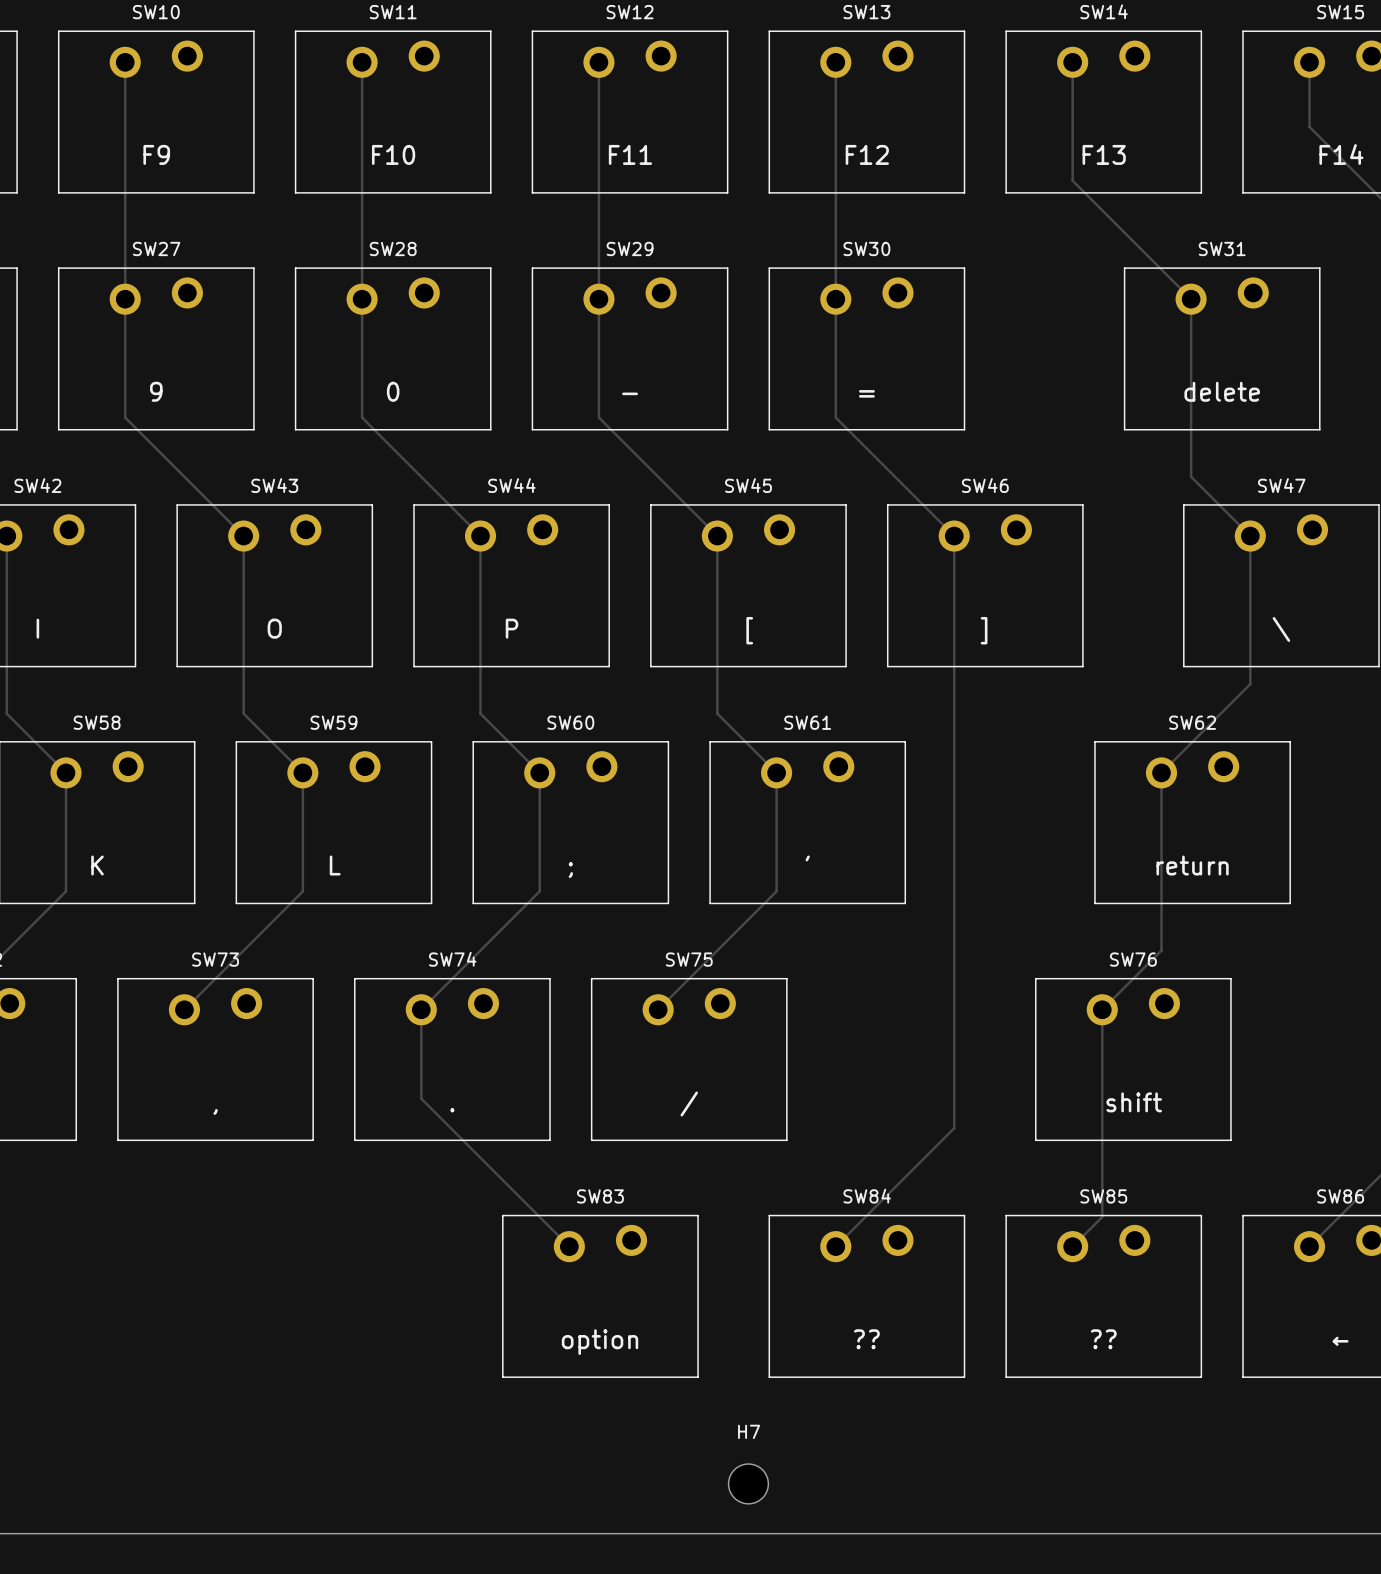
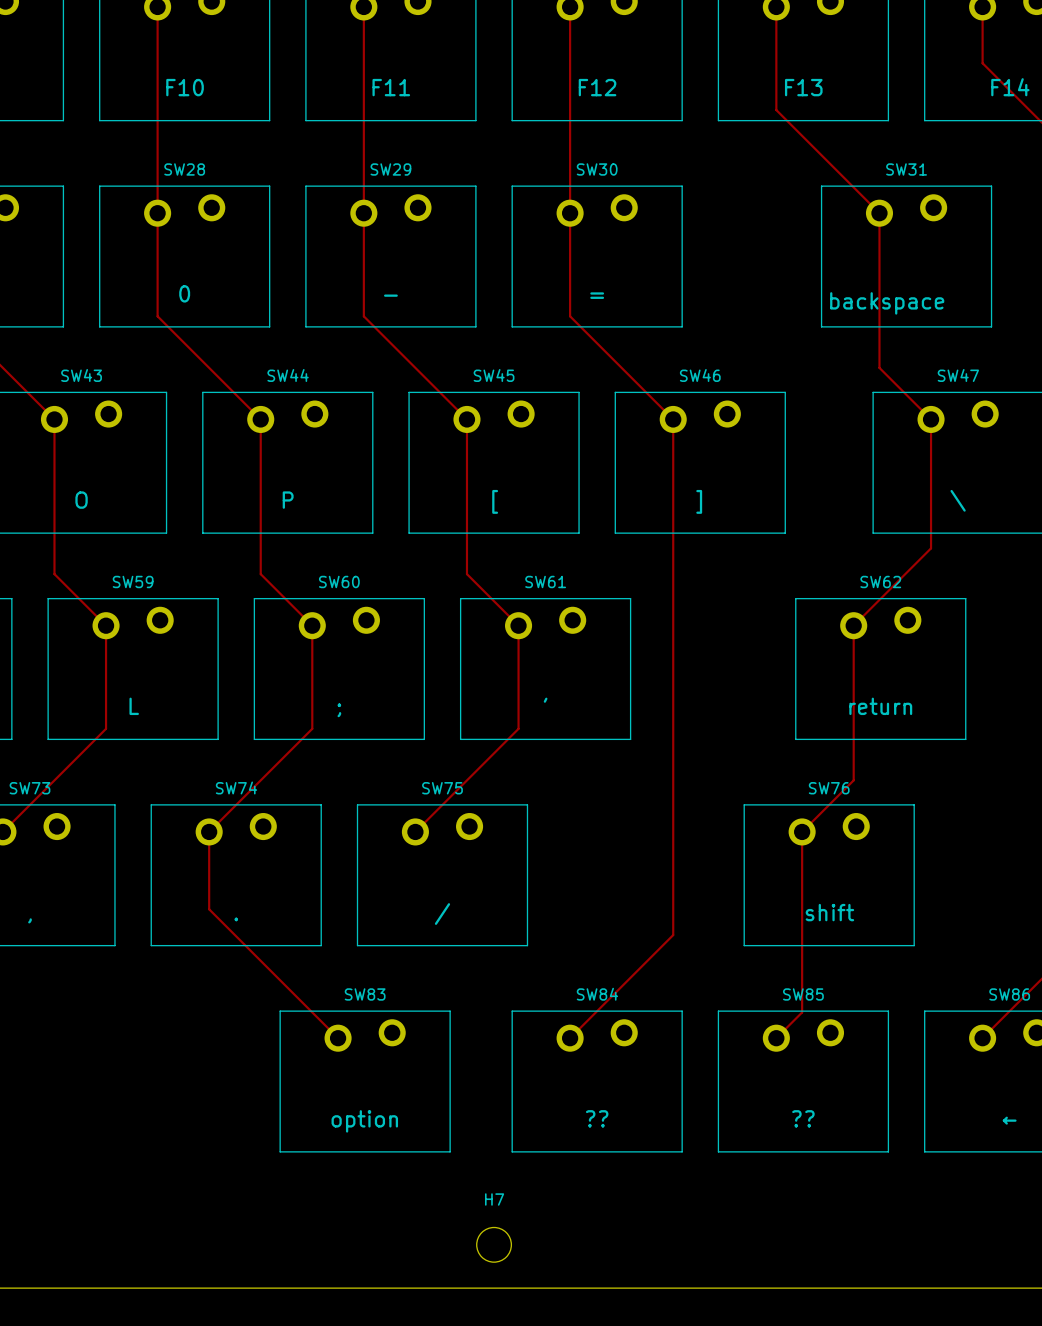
text: delete (1222, 391) -> none
text: none -> backspace (887, 303)

